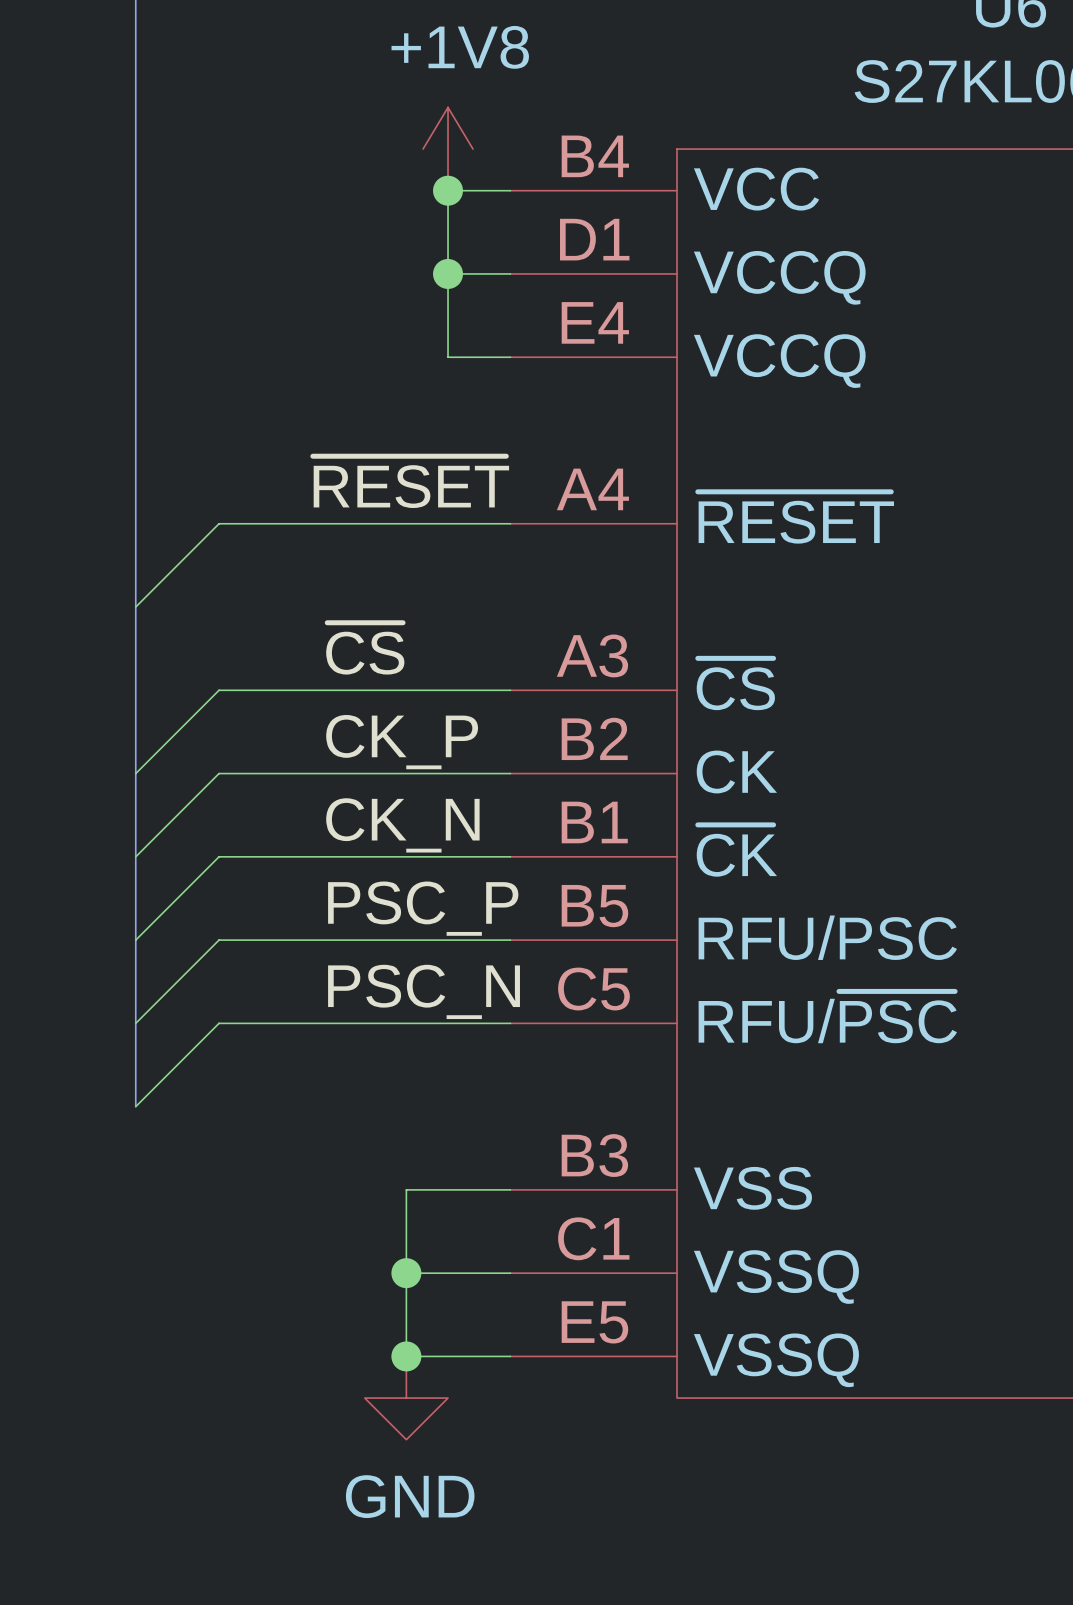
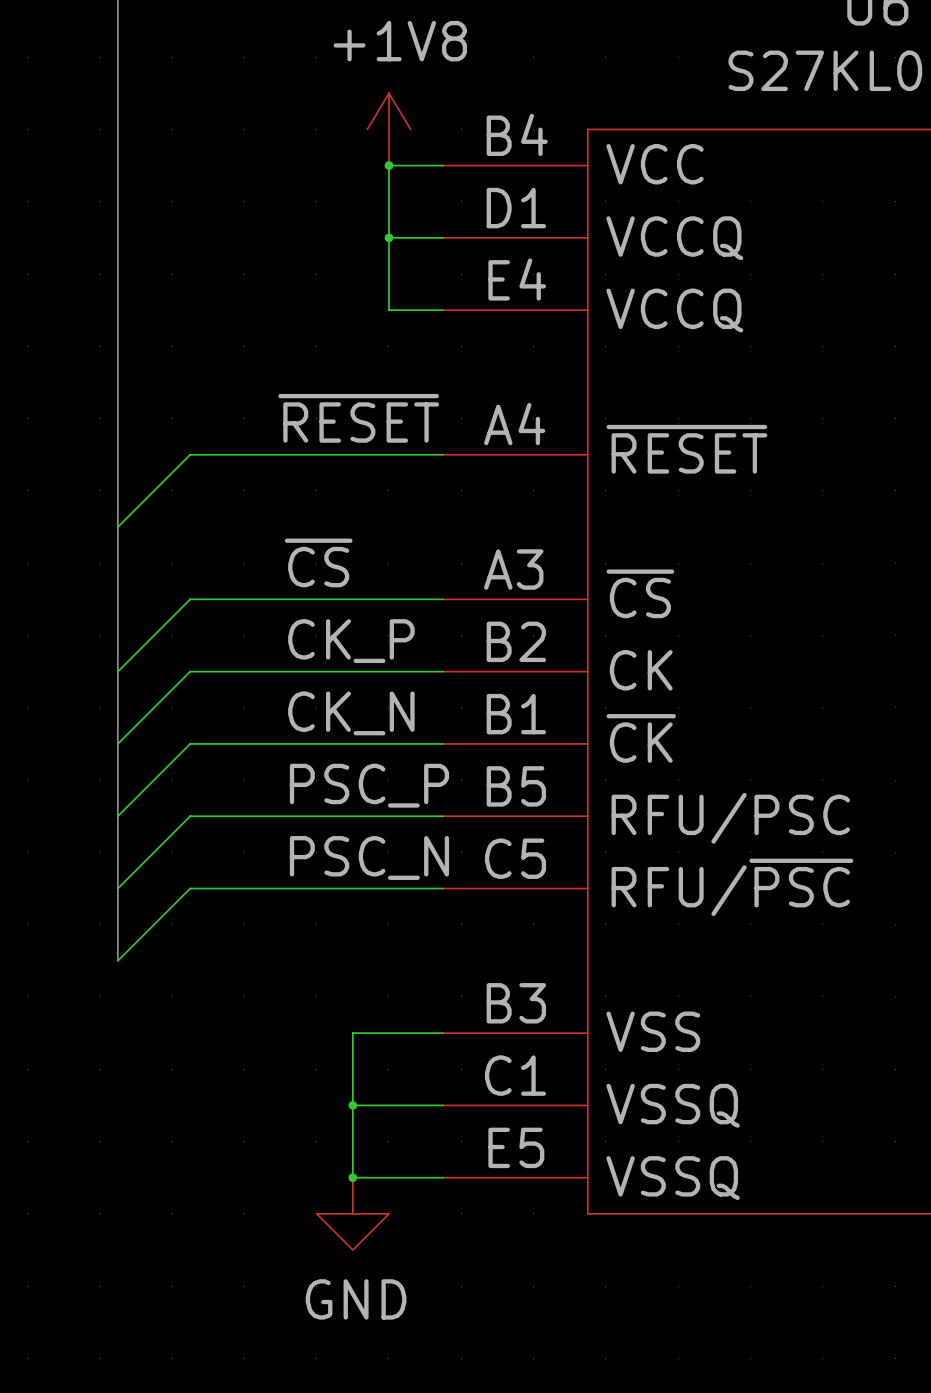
junction size: [433, 175, 464, 206] -> [384, 161, 394, 170]
junction size: [433, 258, 464, 289] -> [384, 233, 394, 243]
junction size: [391, 1258, 422, 1289] -> [348, 1101, 358, 1110]
junction size: [391, 1341, 422, 1372] -> [348, 1173, 358, 1183]

